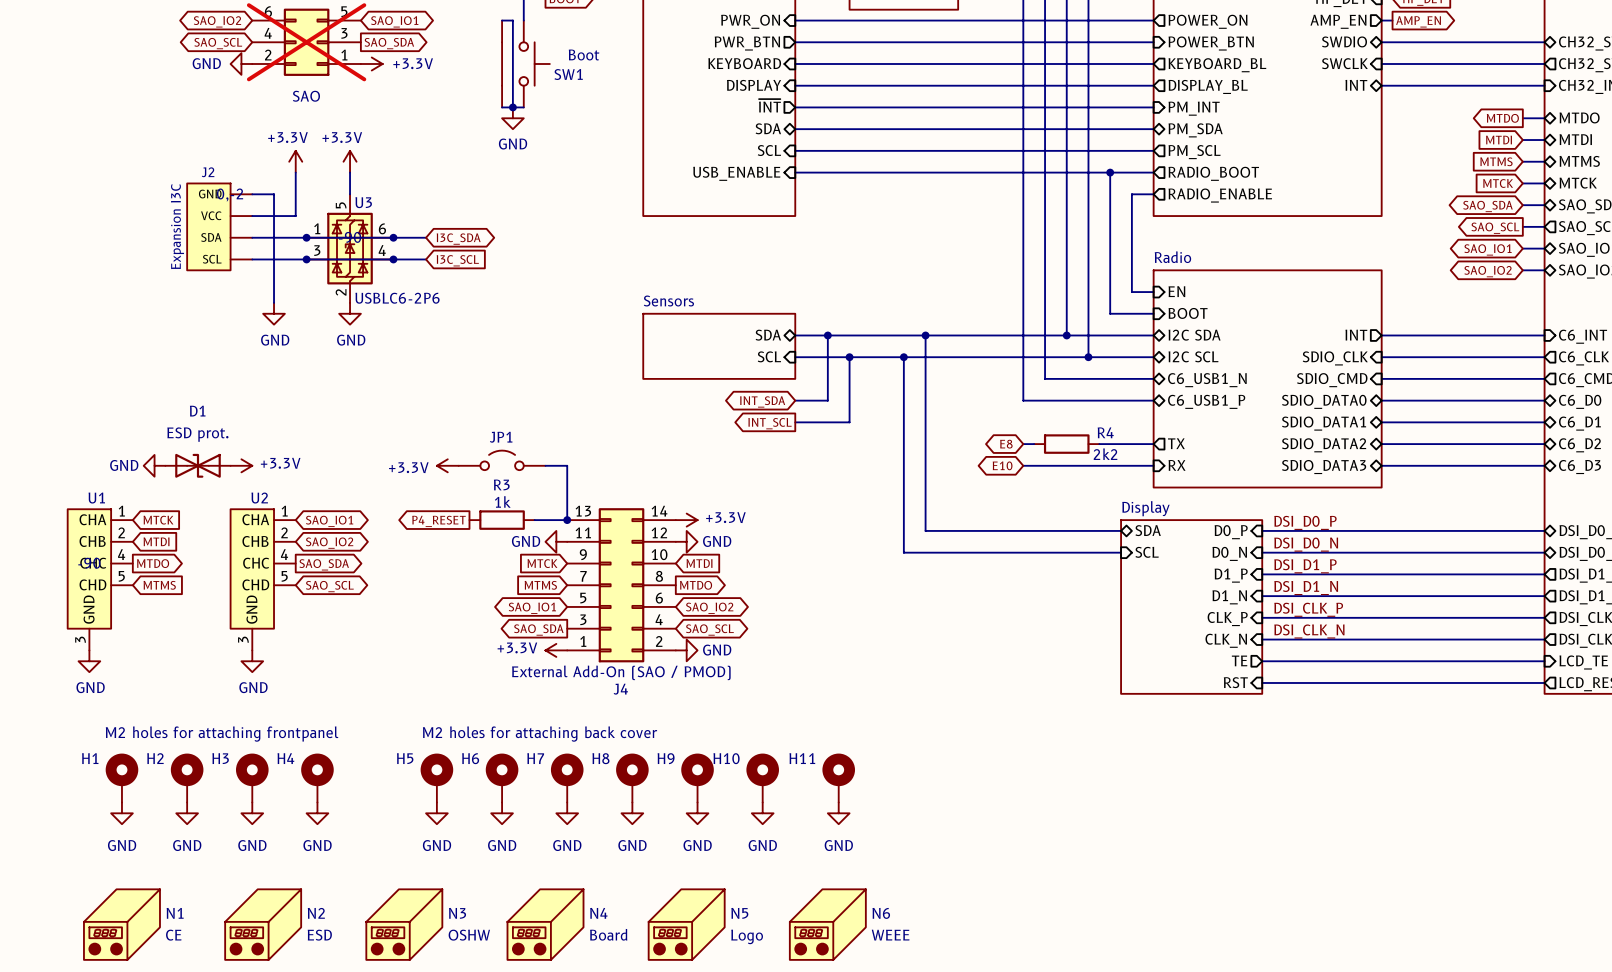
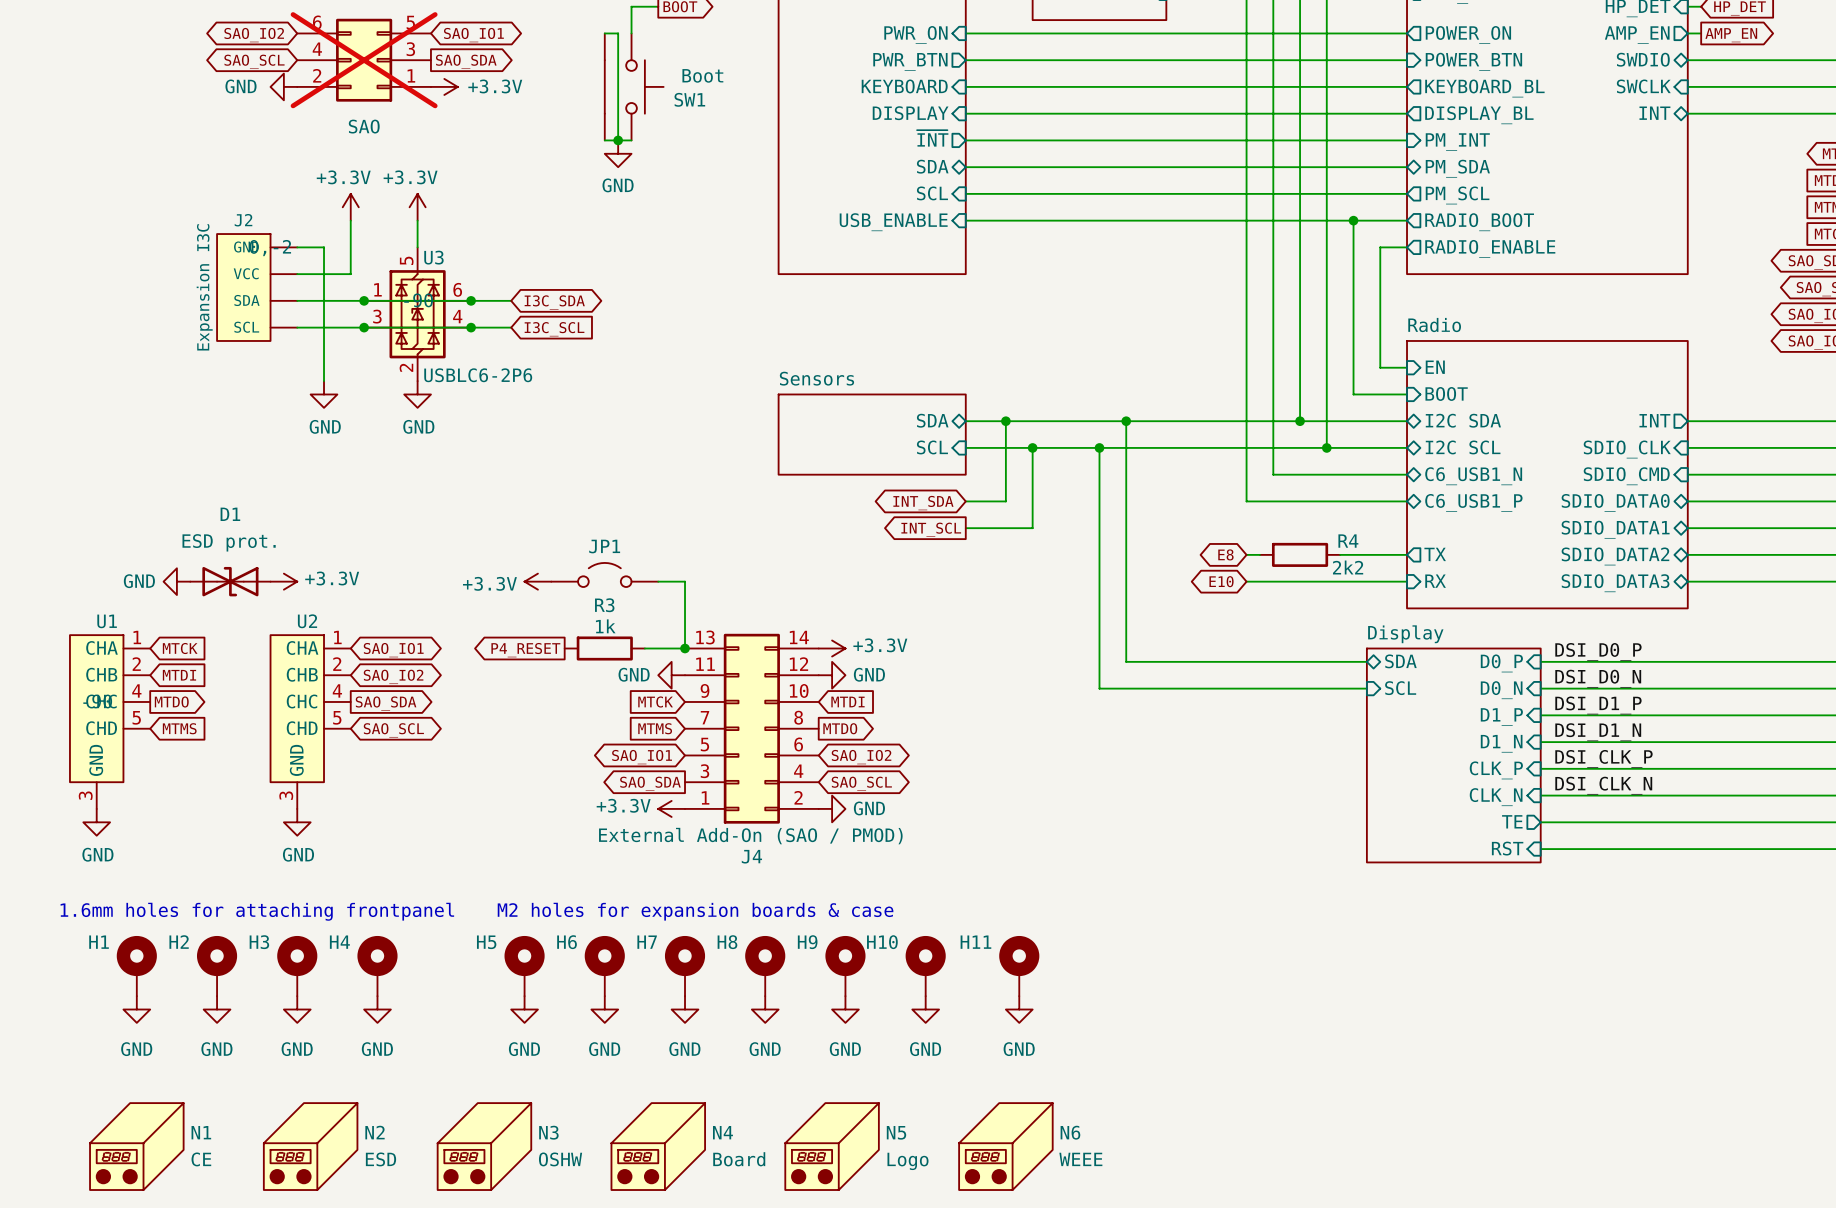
text: M2 holes for attaching frontpanel (222, 734) -> 1.6mm holes for attaching frontpanel (257, 911)
text: M2 holes for attaching back cover (540, 734) -> M2 holes for expansion boards & case (695, 911)

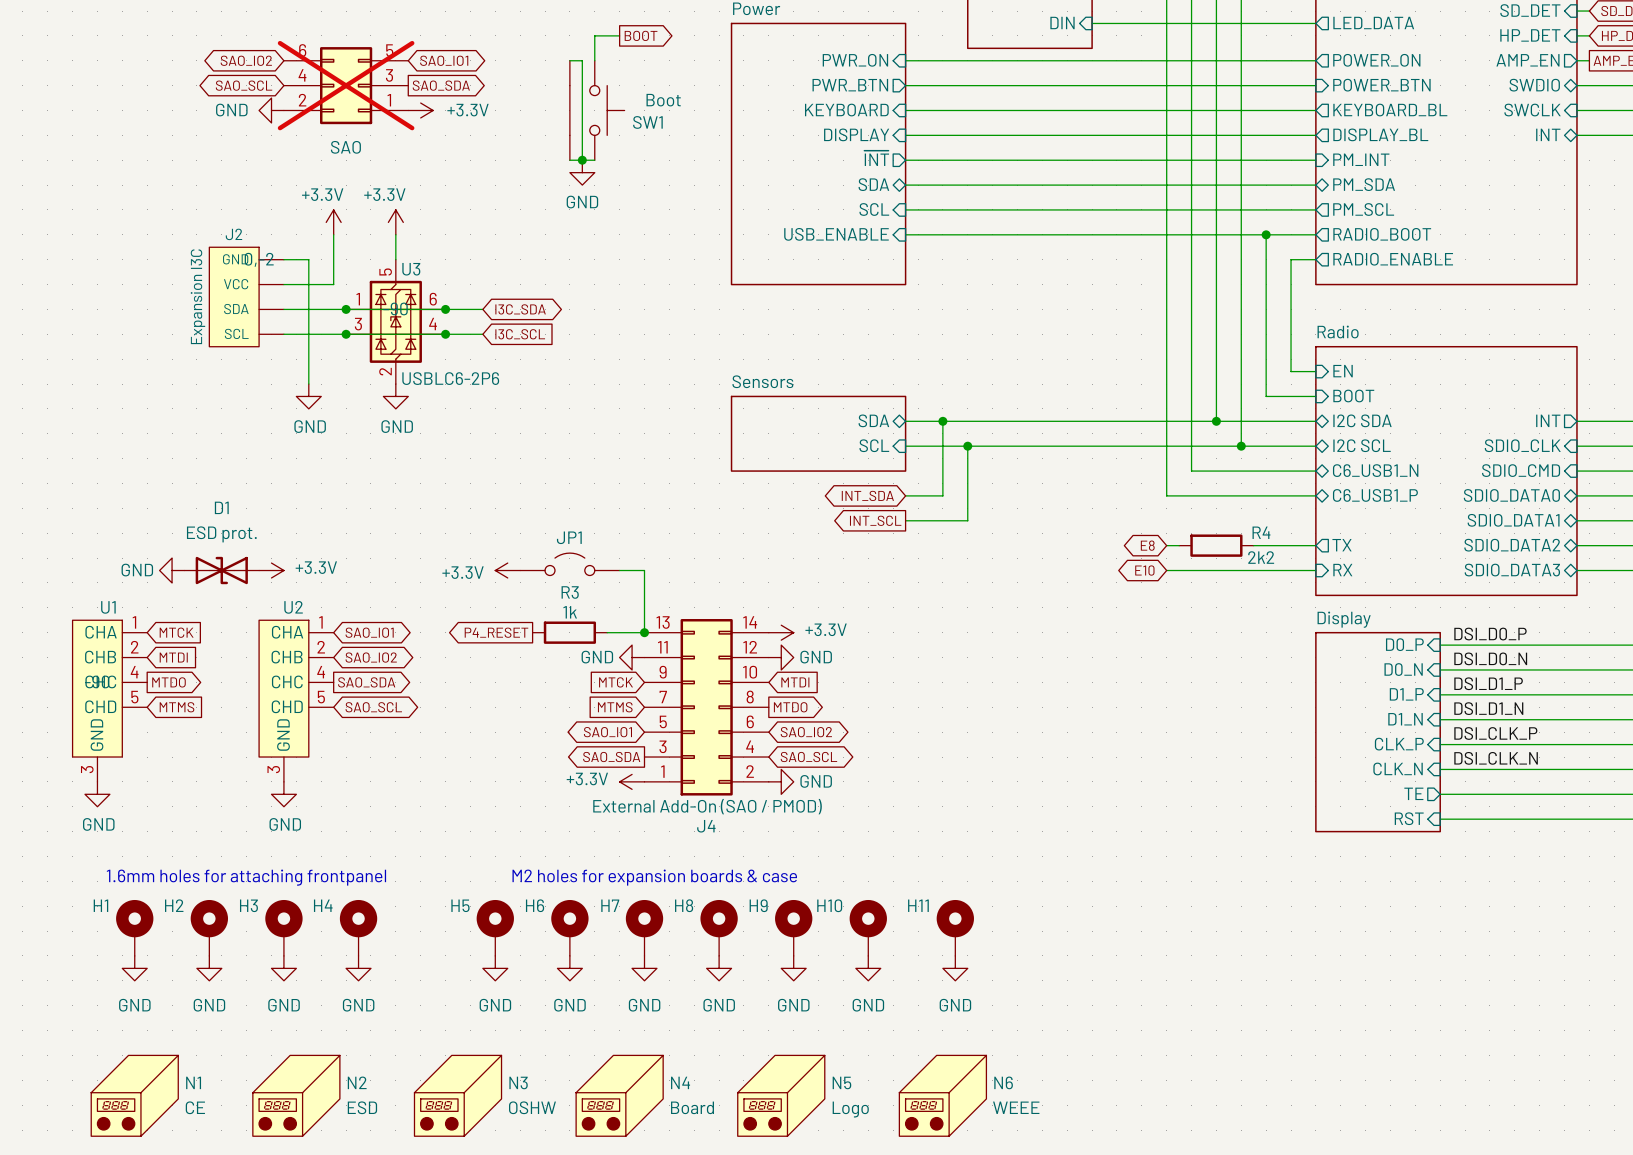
wire: (1126, 421) (1126, 661) (1366, 661) -> none
junction: (1126, 421) -> none
wire: (1099, 447) (1099, 688) (1366, 688) -> none
junction: (1099, 447) -> none
sheet pin: SDA (1400, 661) -> none
sheet pin: SCL (1400, 688) -> none
sheet Display: (1453, 755) -> none
sheet Display: none -> (1378, 732)

